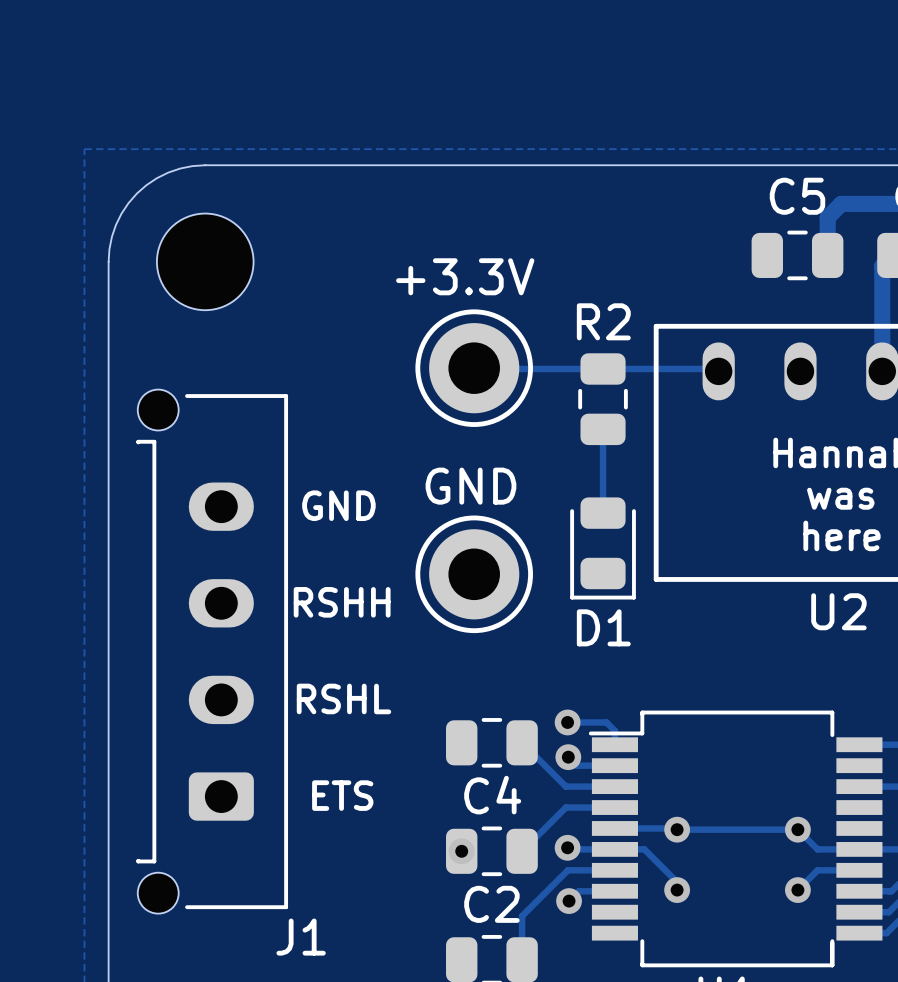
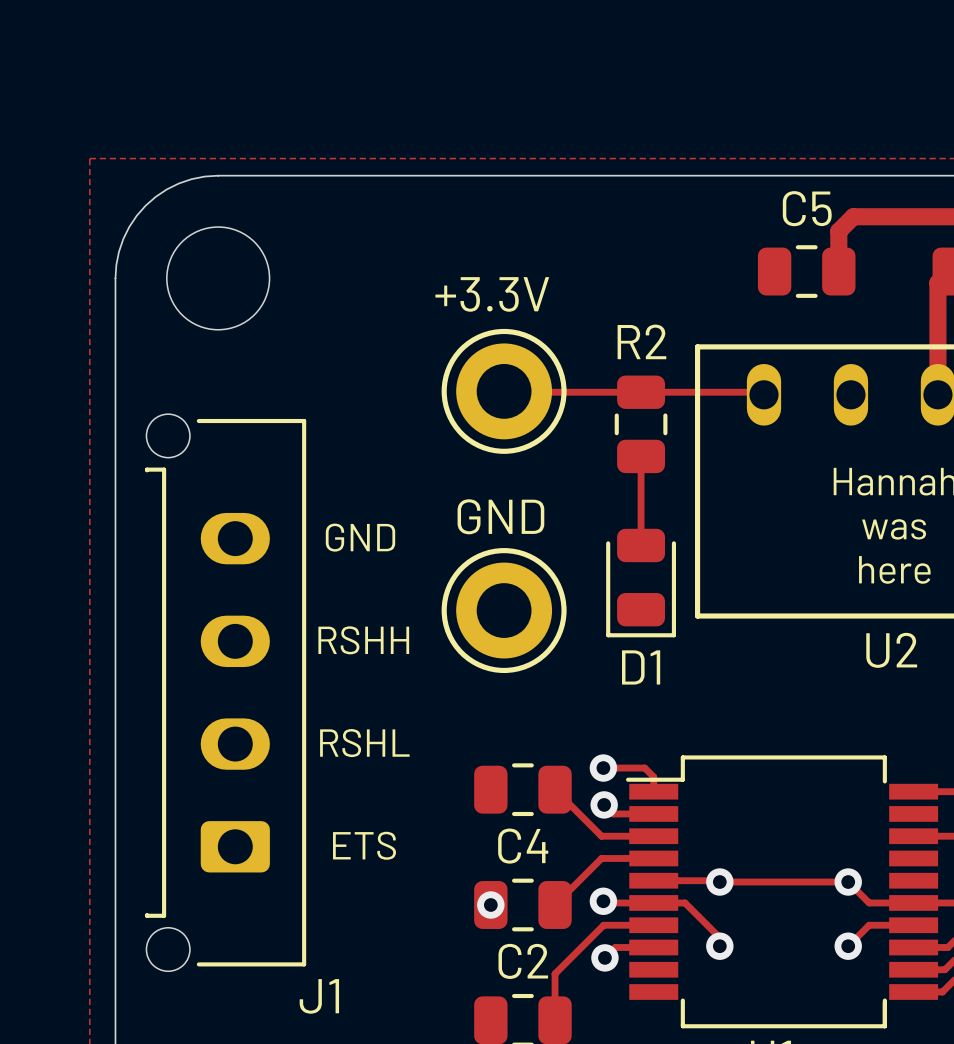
track: (841, 203) (827, 217) (827, 255) -> (894, 216) (853, 216) (838, 231) (838, 271)
C5 position: (797, 255) -> (806, 271)

